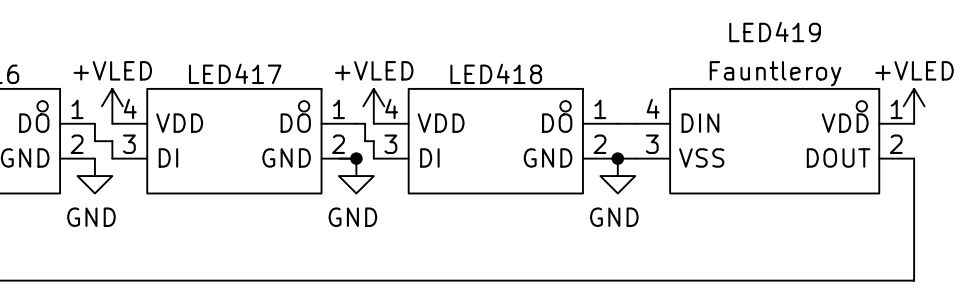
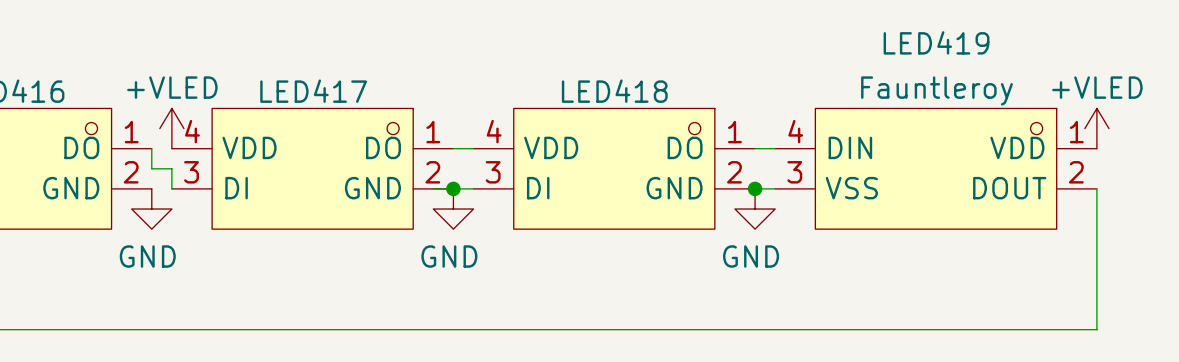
power symbol: +VLED (373, 106) -> none
wire: (365, 123) (365, 141) (373, 141) (373, 158) -> (463, 148) (473, 148)
wire: none -> (453, 188) (473, 188)

